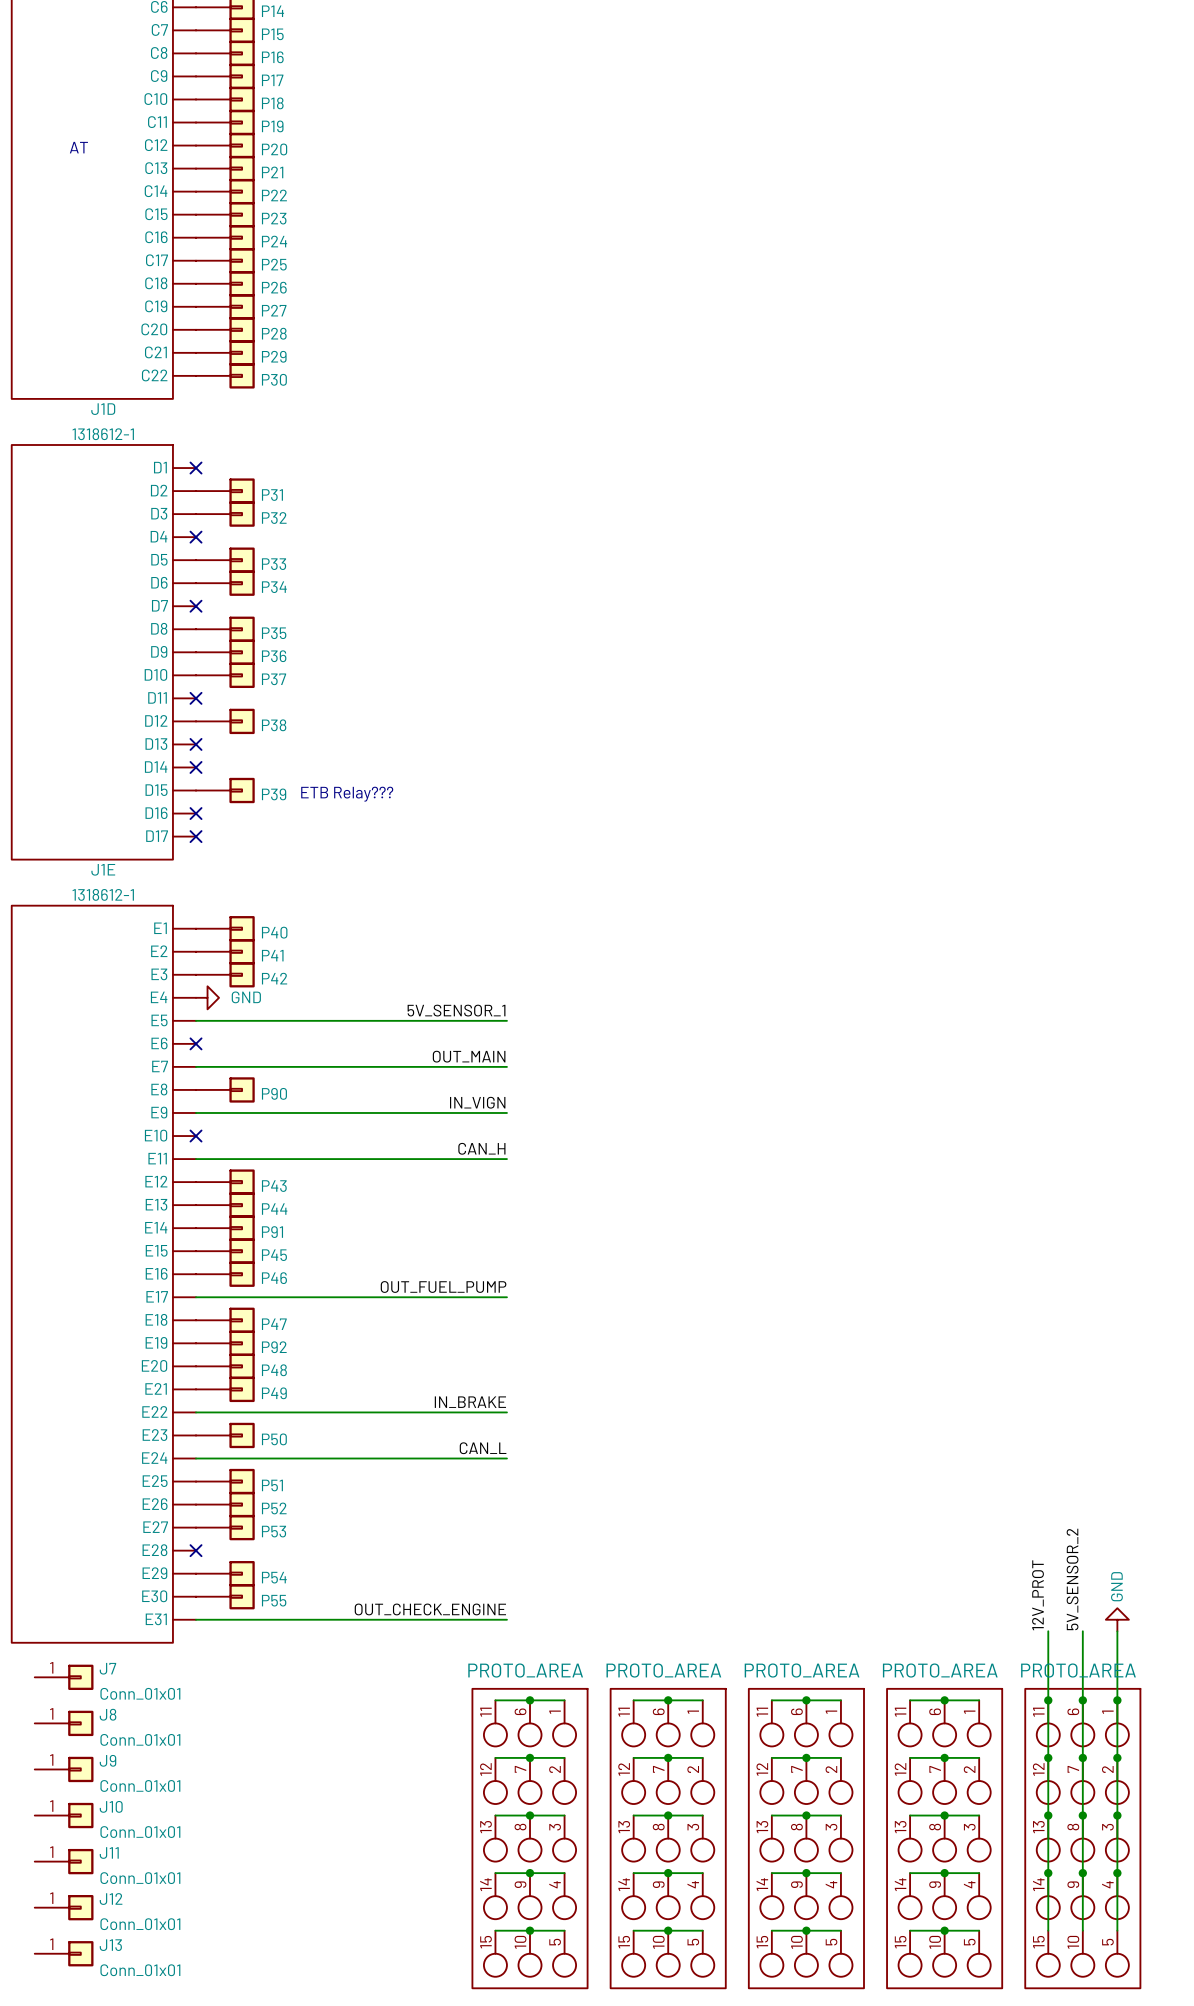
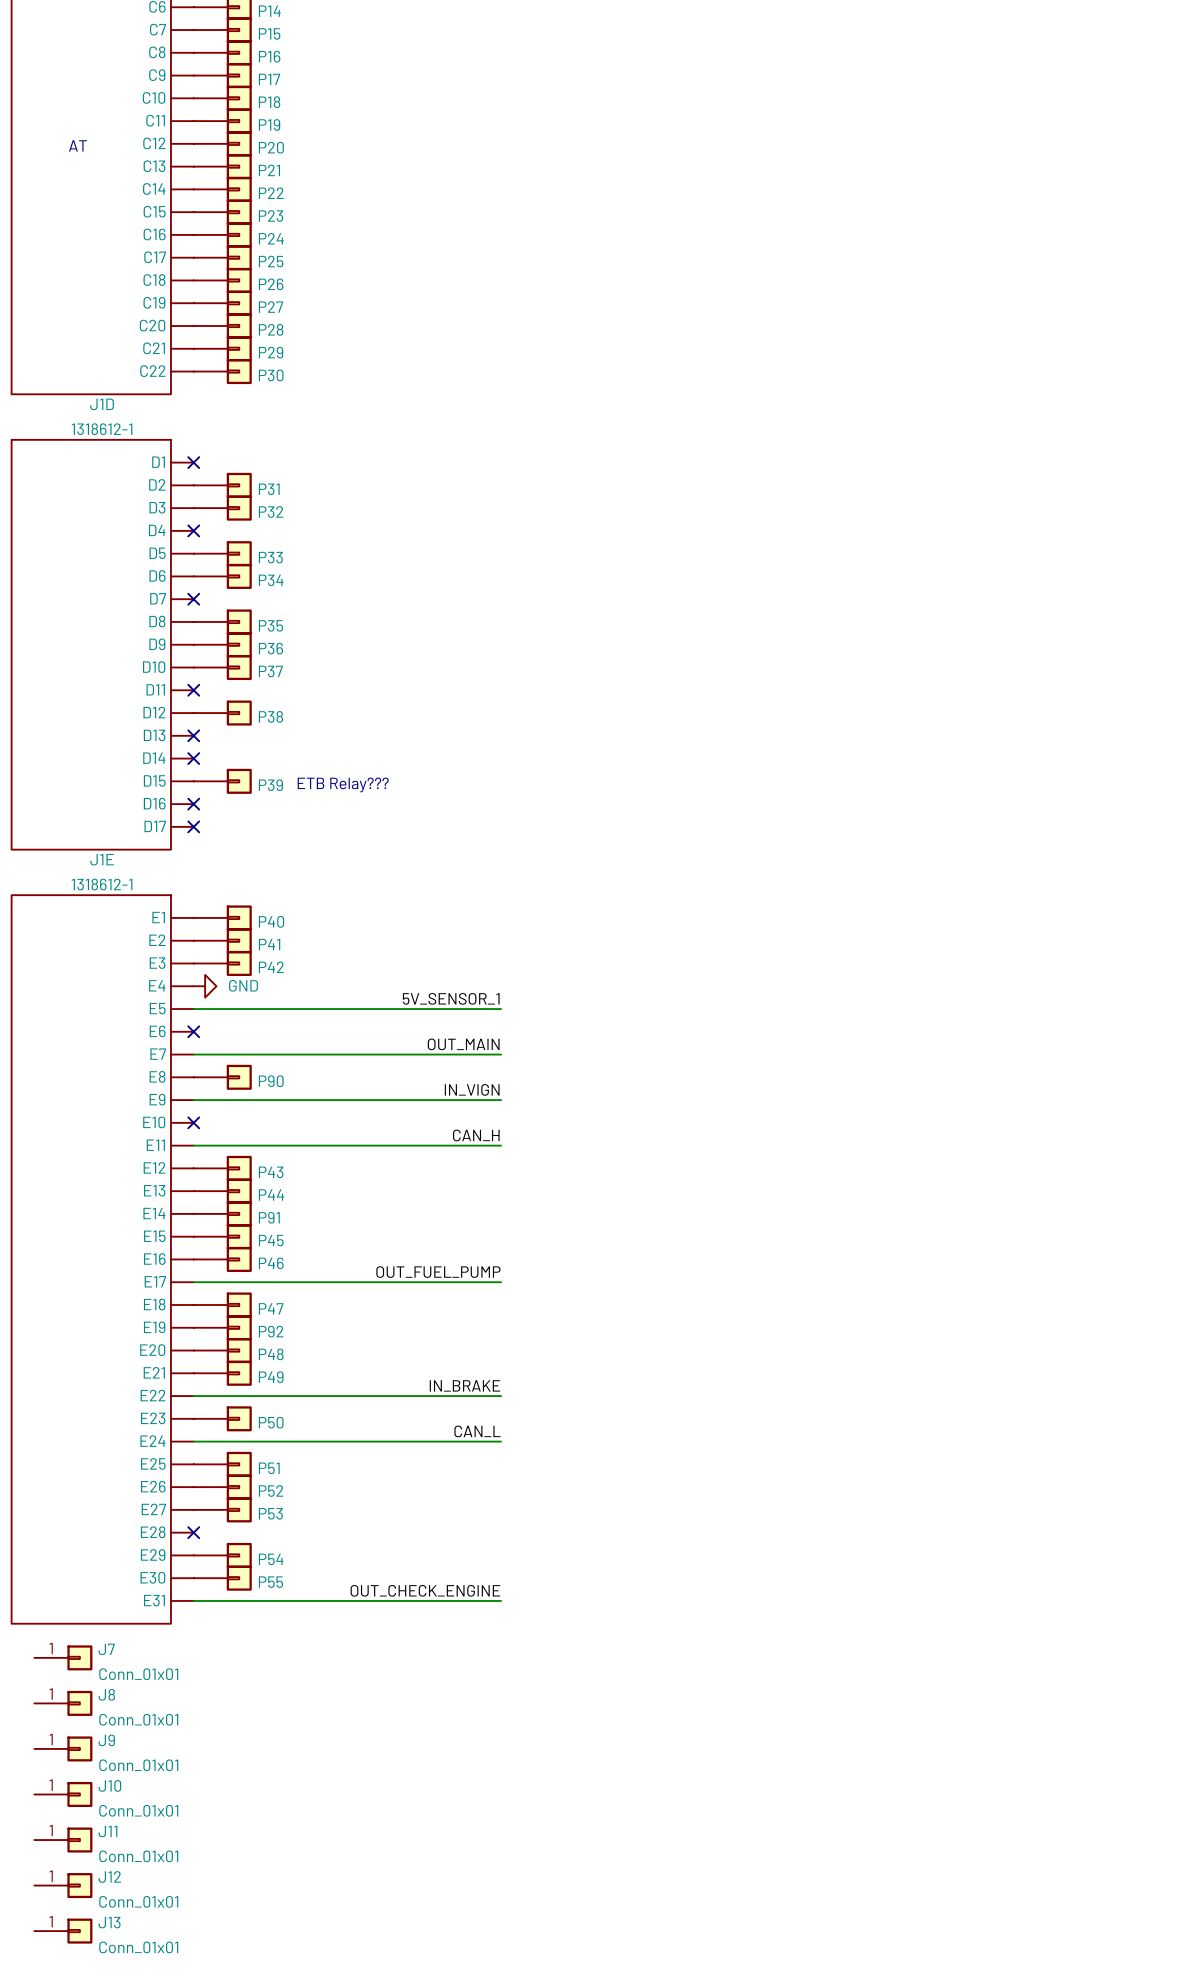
label: 5V_SENSOR_2 (1072, 1579) -> none
label: 12V_PROT (1037, 1595) -> none
power symbol: GND (1117, 1619) -> none
wire: (1048, 1631) (1048, 1930) -> none
wire: (1082, 1631) (1082, 1930) -> none
wire: (1117, 1631) (1117, 1930) -> none
wire: (495, 1700) (564, 1700) -> none
junction: (530, 1700) -> none
wire: (633, 1700) (702, 1700) -> none
junction: (668, 1700) -> none
wire: (771, 1700) (840, 1700) -> none
junction: (806, 1700) -> none
wire: (910, 1700) (979, 1700) -> none
junction: (944, 1700) -> none
junction: (1048, 1700) -> none
junction: (1082, 1700) -> none
junction: (1117, 1700) -> none
wire: (495, 1757) (564, 1757) -> none
junction: (530, 1757) -> none
wire: (633, 1757) (702, 1757) -> none
junction: (668, 1757) -> none
wire: (771, 1757) (840, 1757) -> none
junction: (806, 1757) -> none
wire: (910, 1757) (979, 1757) -> none
junction: (944, 1757) -> none
junction: (1048, 1757) -> none
junction: (1082, 1757) -> none
junction: (1117, 1757) -> none
wire: (495, 1815) (564, 1815) -> none
junction: (530, 1815) -> none
wire: (633, 1815) (702, 1815) -> none
junction: (668, 1815) -> none
wire: (771, 1815) (840, 1815) -> none
junction: (806, 1815) -> none
wire: (910, 1815) (979, 1815) -> none
junction: (944, 1815) -> none
junction: (1048, 1815) -> none
junction: (1082, 1815) -> none
junction: (1117, 1815) -> none
part: PROTO_AREA (530, 1838) -> none
part: PROTO_AREA (668, 1838) -> none
part: PROTO_AREA (806, 1838) -> none
part: PROTO_AREA (944, 1838) -> none
part: PROTO_AREA (1082, 1838) -> none
wire: (495, 1873) (564, 1873) -> none
junction: (530, 1873) -> none
wire: (633, 1873) (702, 1873) -> none
junction: (668, 1873) -> none
wire: (771, 1873) (840, 1873) -> none
junction: (806, 1873) -> none
wire: (910, 1873) (979, 1873) -> none
junction: (944, 1873) -> none
junction: (1048, 1873) -> none
junction: (1082, 1873) -> none
junction: (1117, 1873) -> none
wire: (495, 1930) (564, 1930) -> none
junction: (530, 1930) -> none
wire: (633, 1930) (702, 1930) -> none
junction: (668, 1930) -> none
wire: (771, 1930) (840, 1930) -> none
junction: (806, 1930) -> none
wire: (910, 1930) (979, 1930) -> none
junction: (944, 1930) -> none

